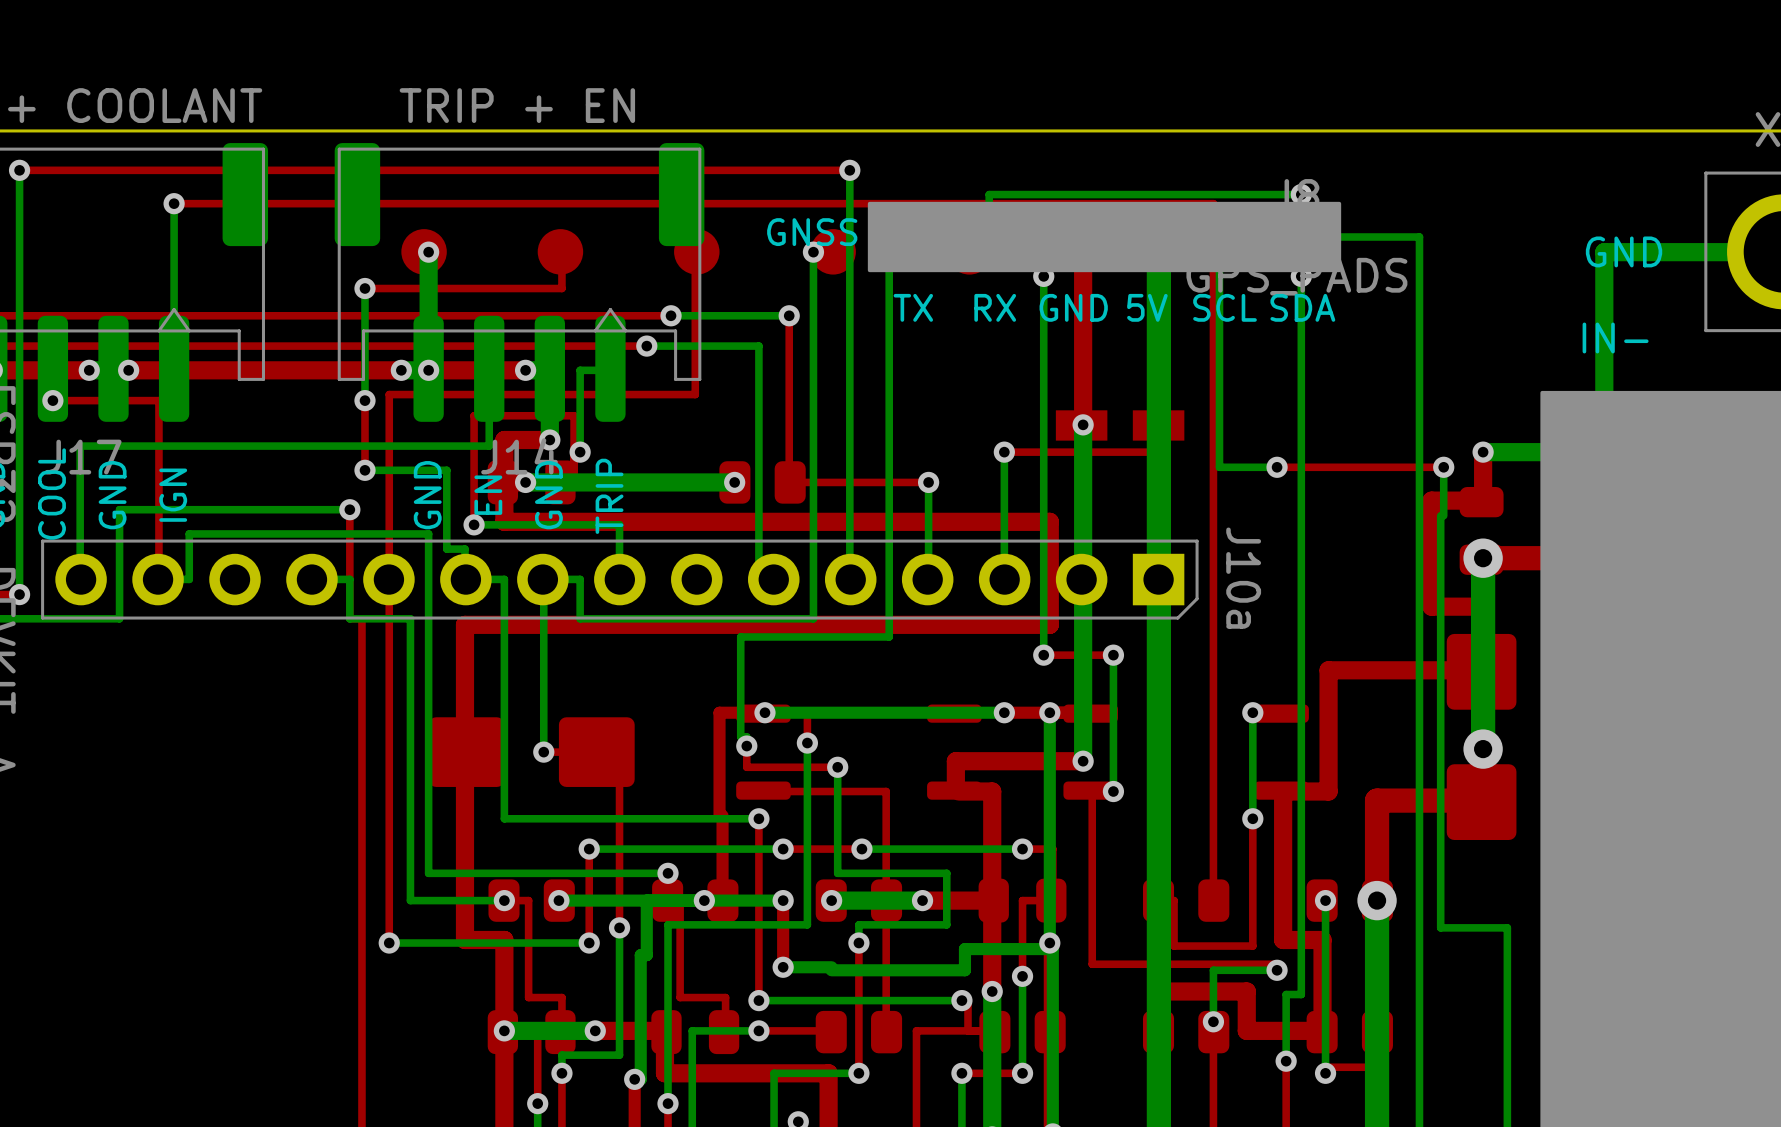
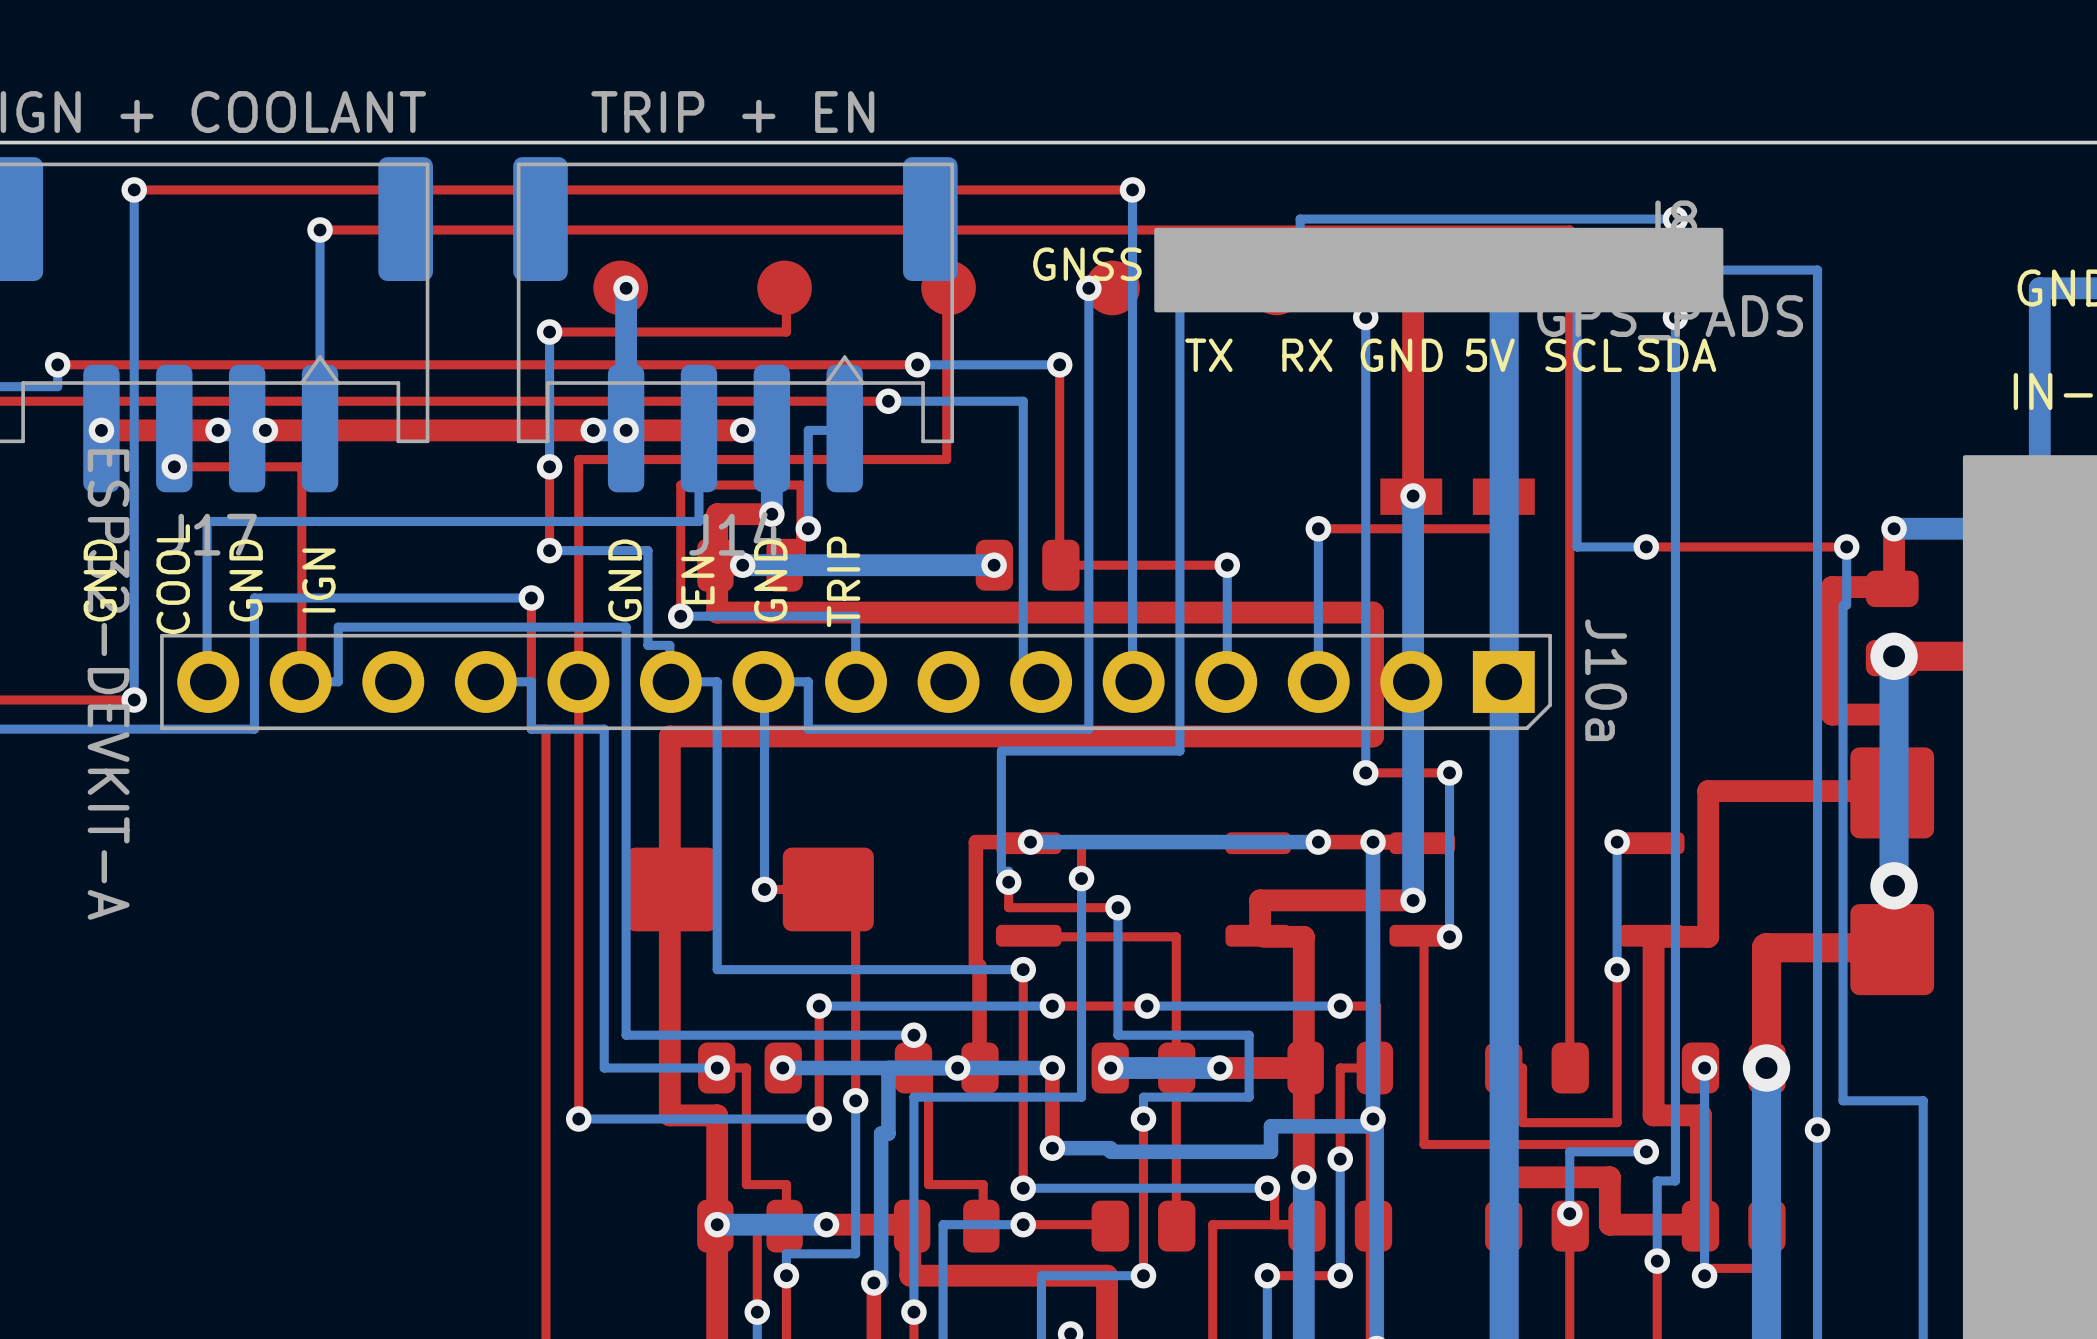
via: none -> (1817, 1129)

